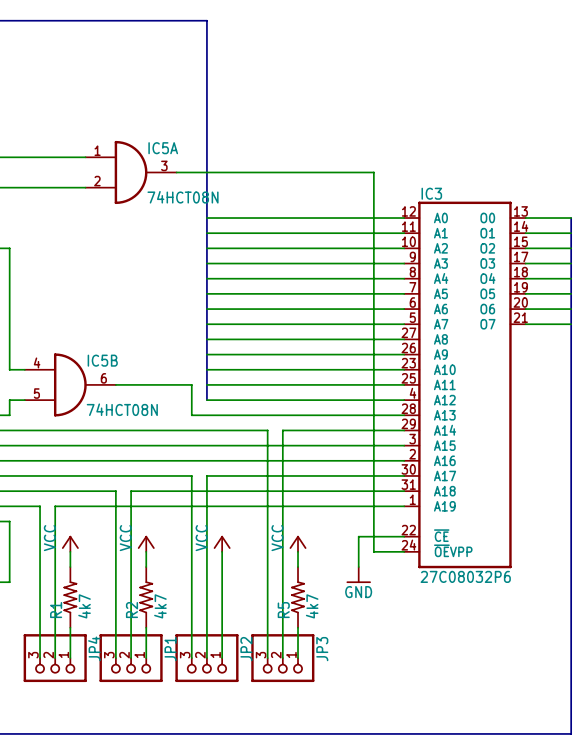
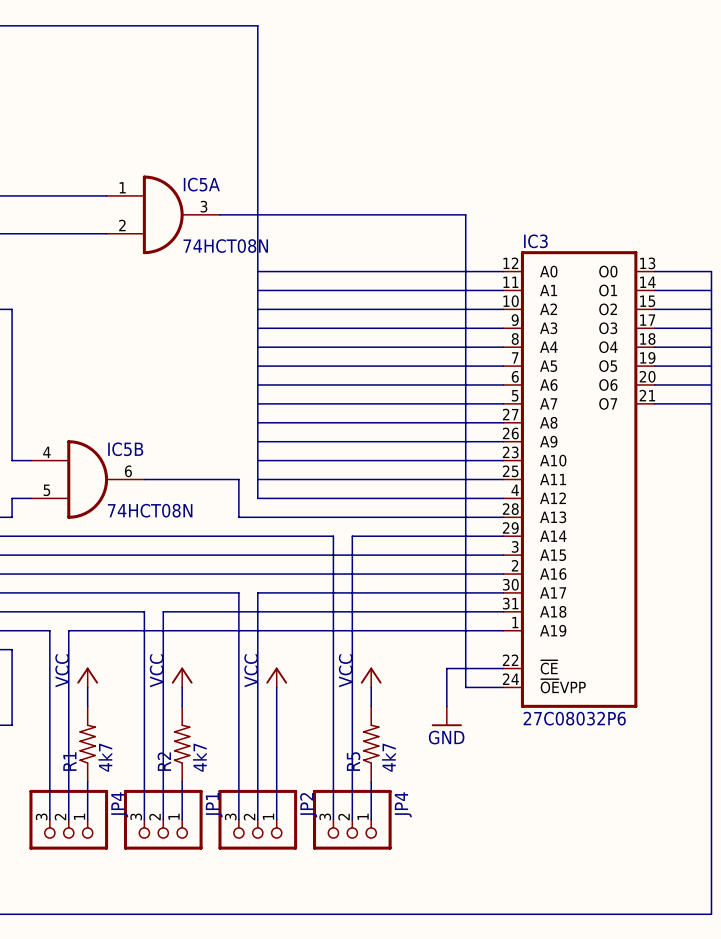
JP3 name: JP3 (322, 649) -> JP4 (403, 804)

